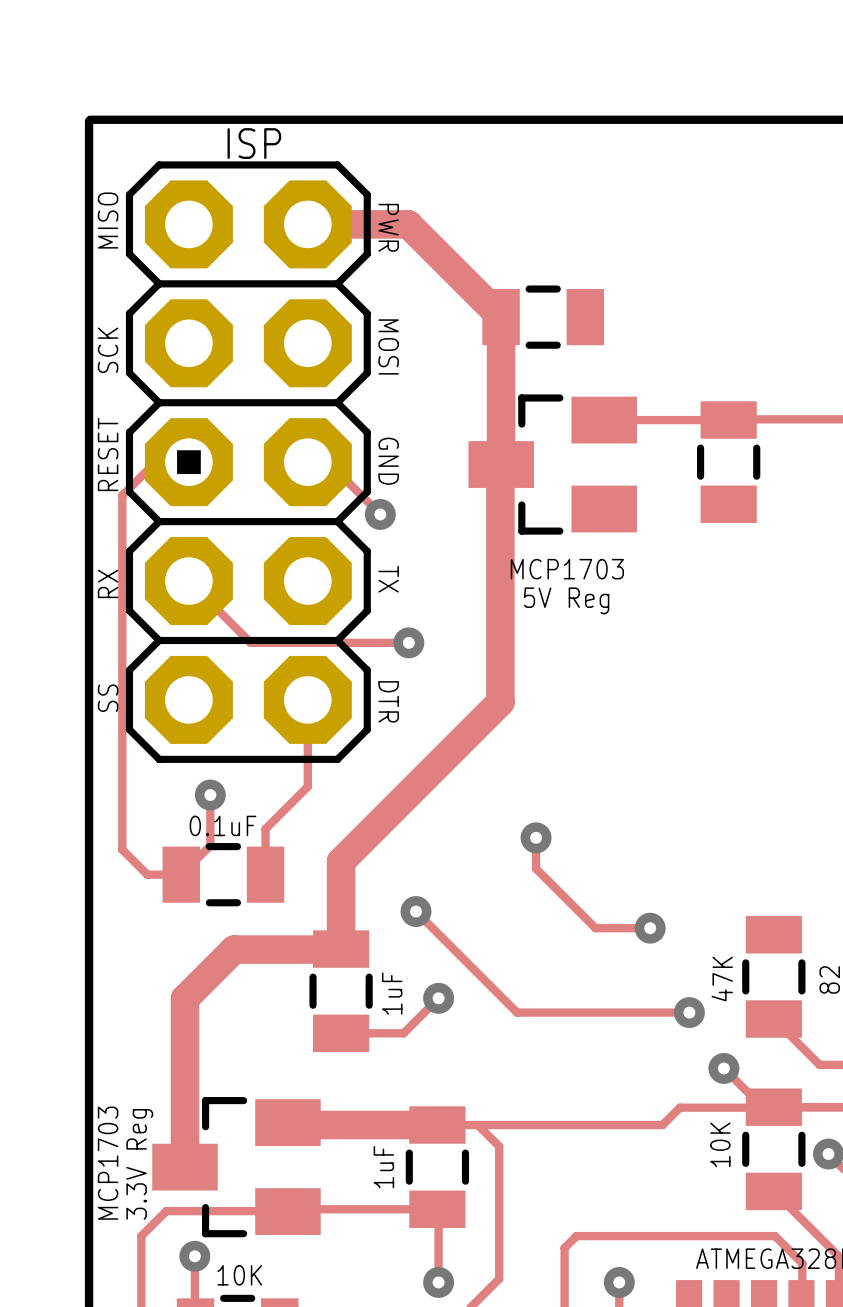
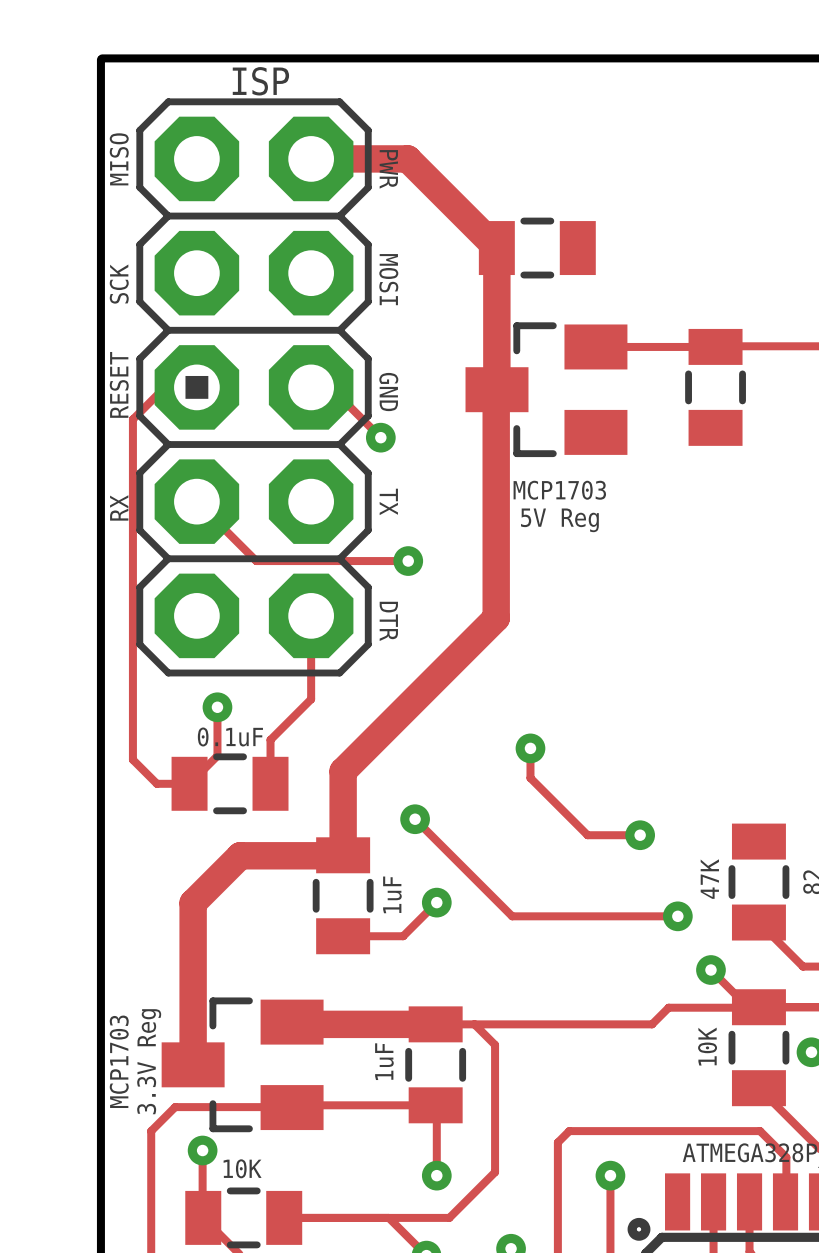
text: SS (108, 698) -> none

